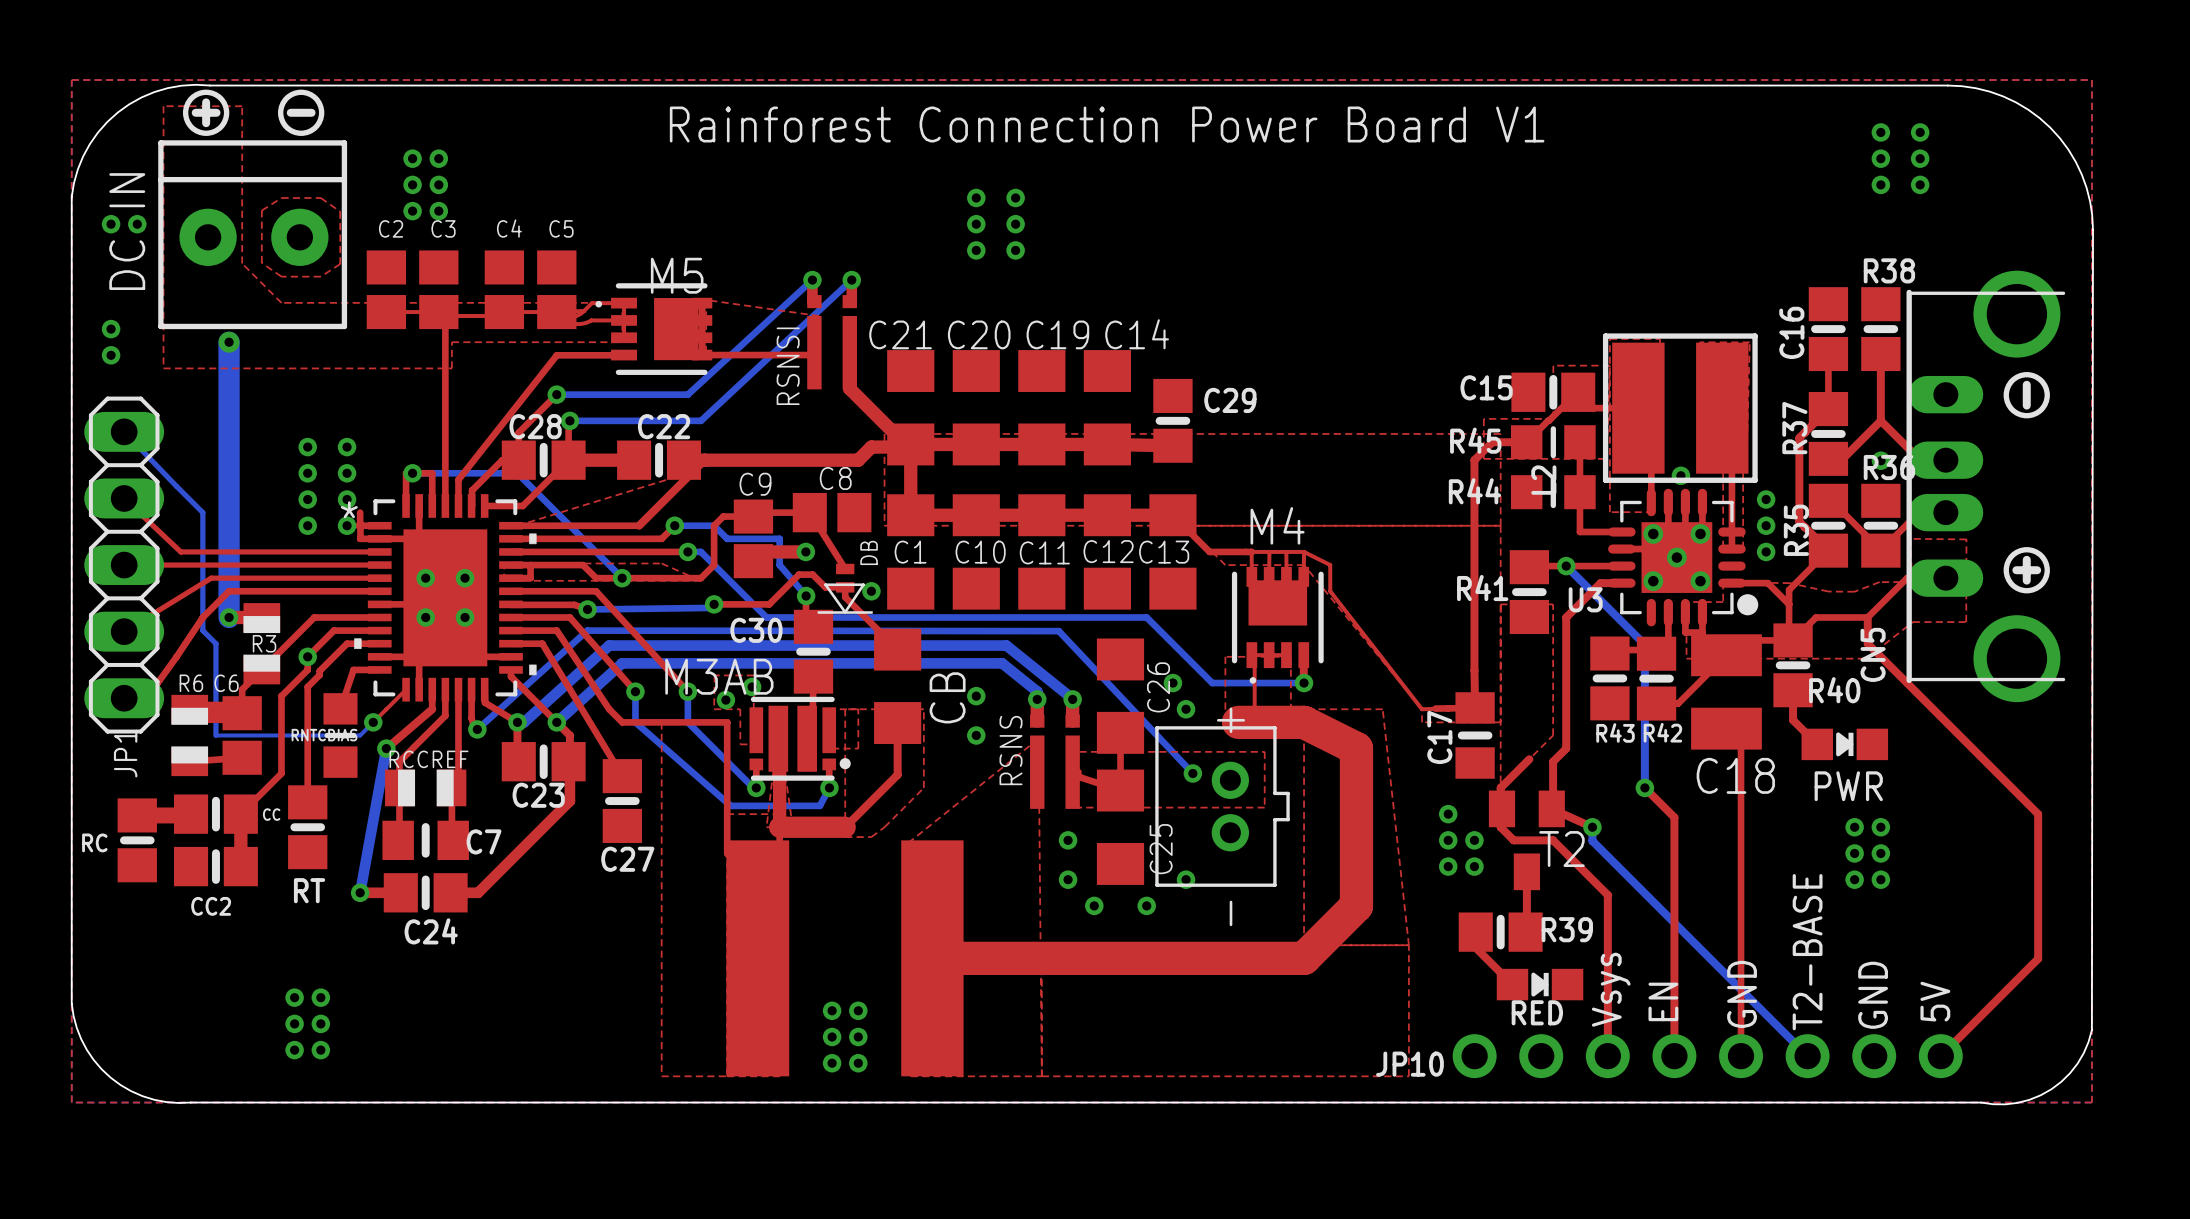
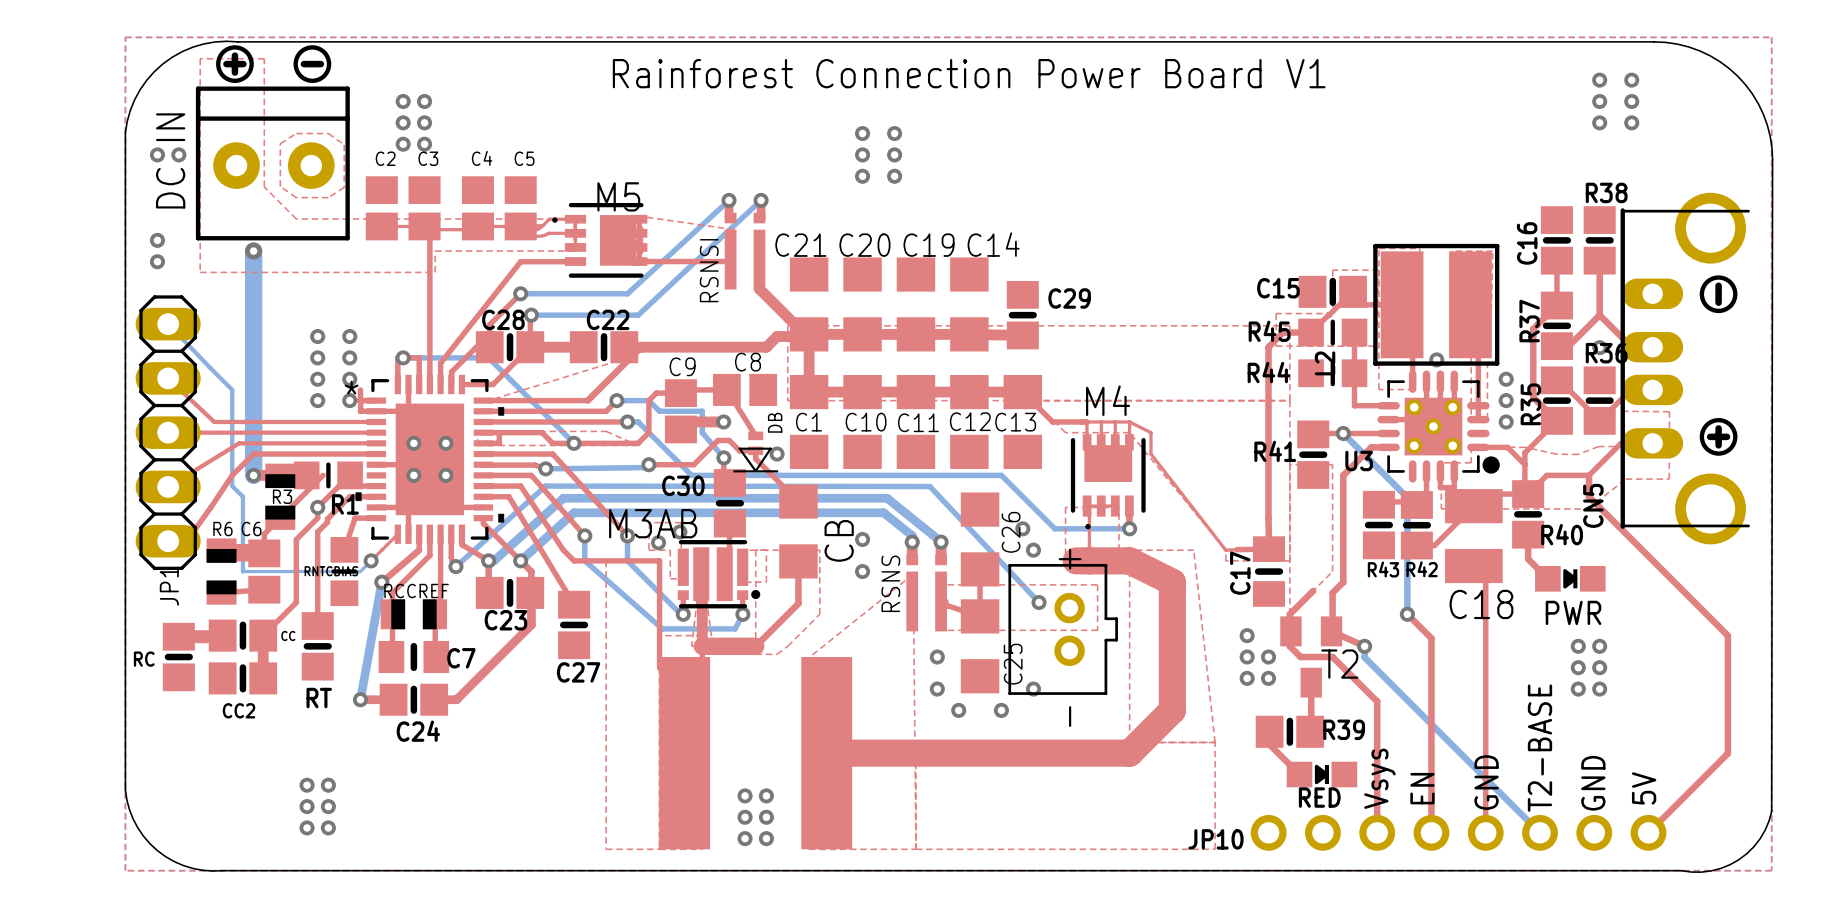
top track: (314, 617) (379, 617) -> none
R1: none -> (328, 475)

